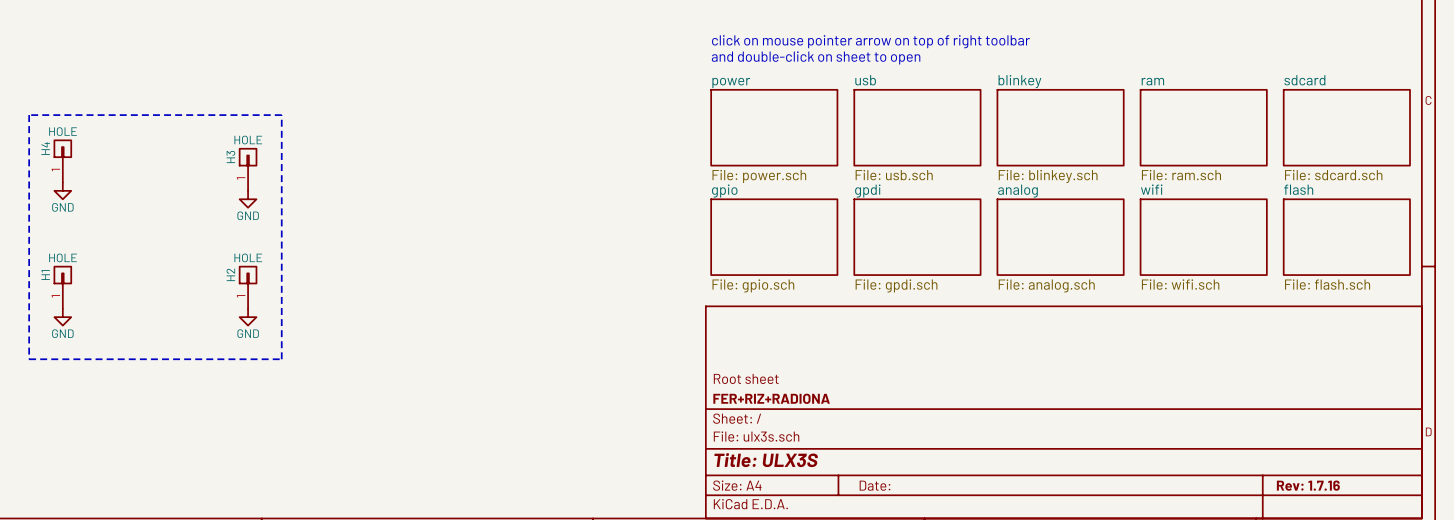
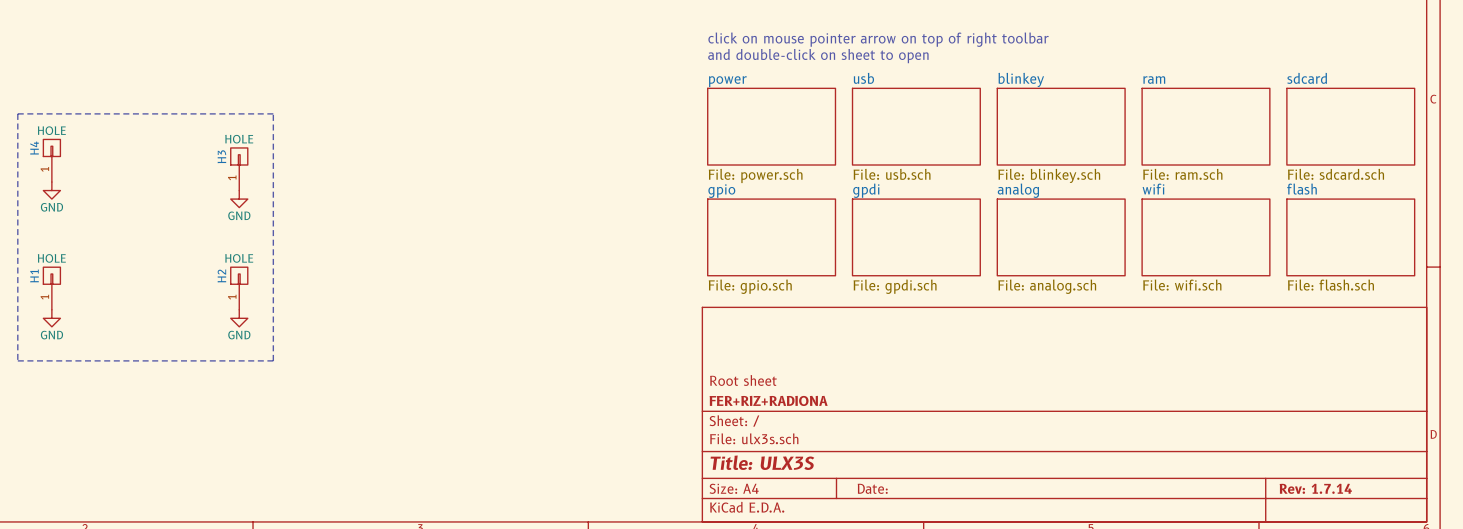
title block: Rev: 1.7.16 (1308, 485) -> Rev: 1.7.14 (1315, 488)

